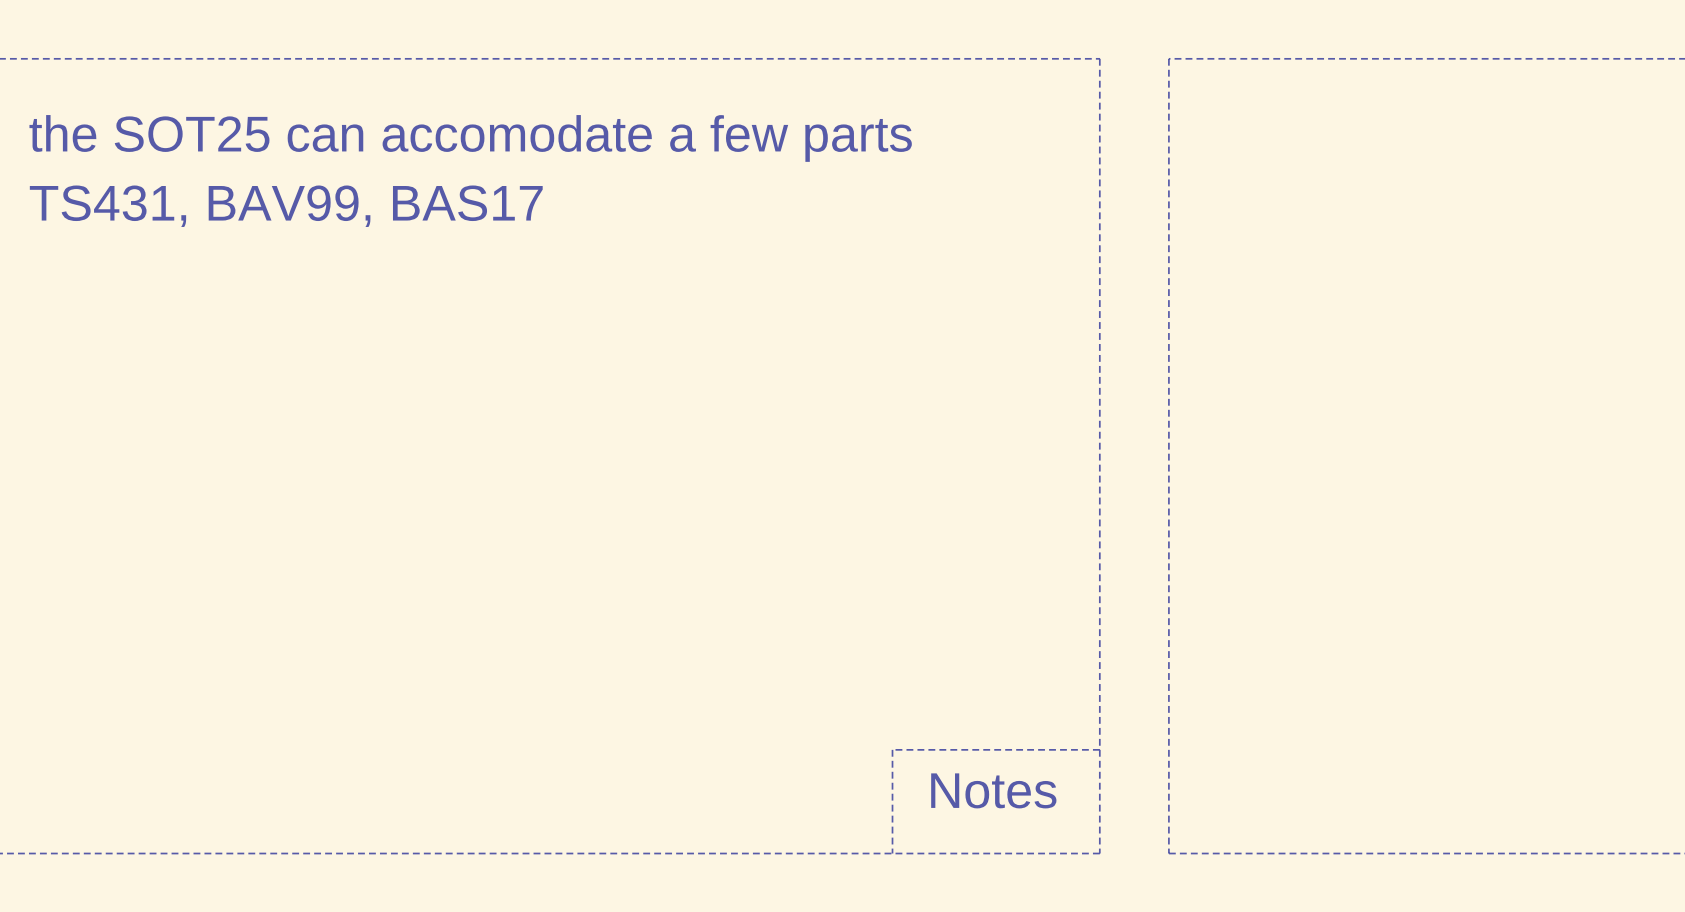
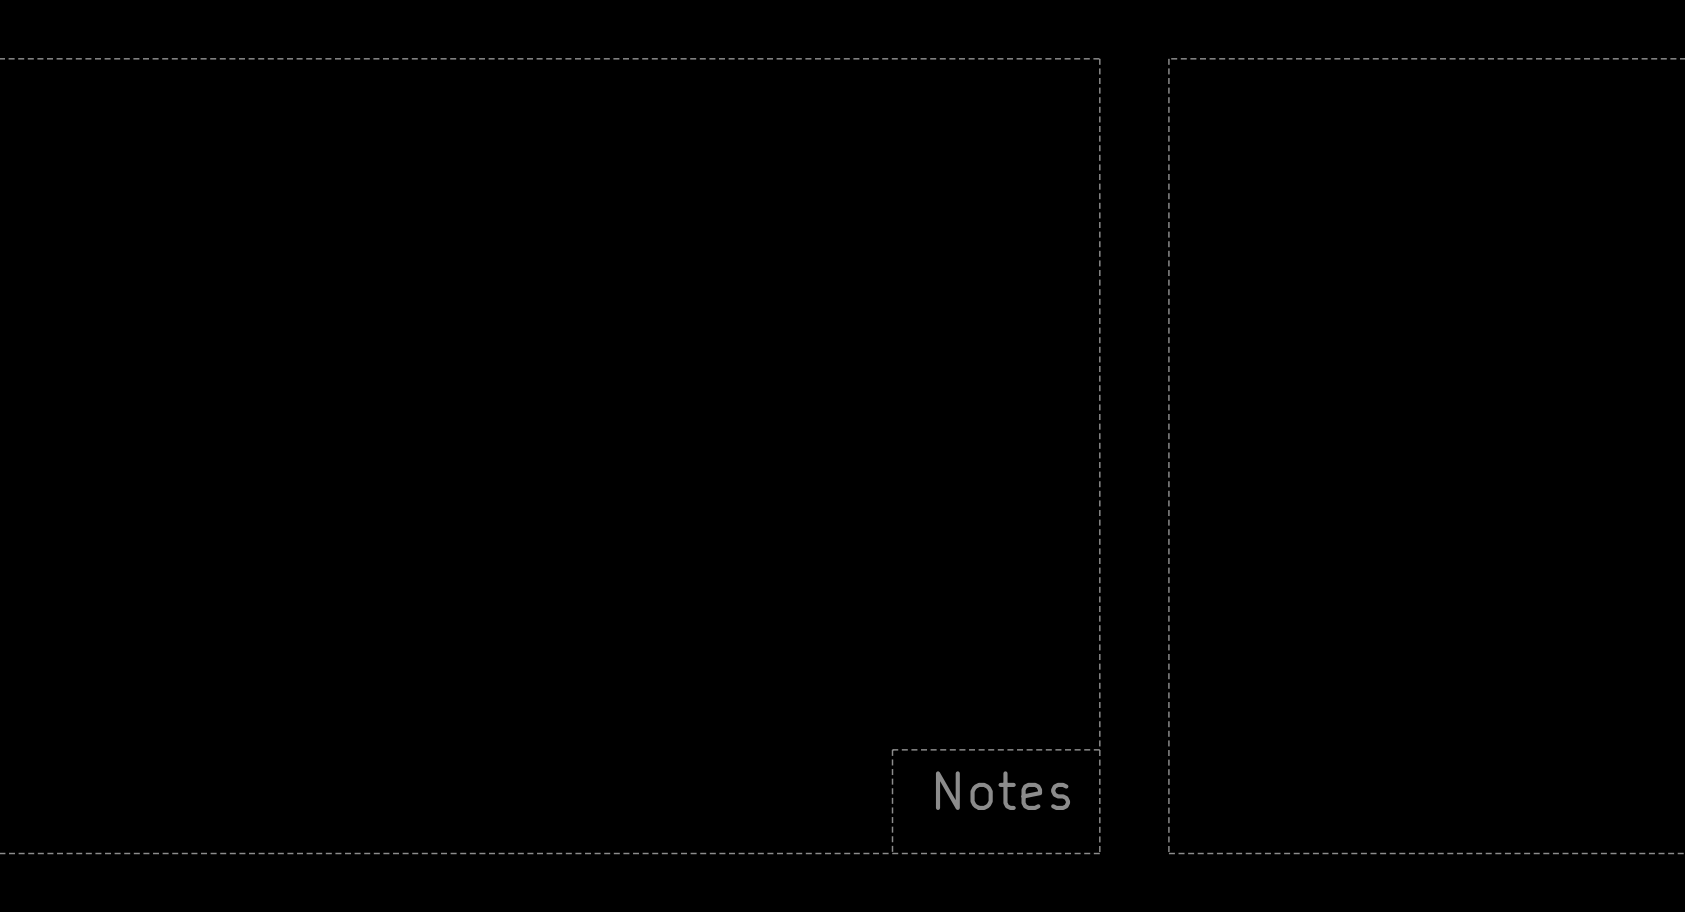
text: the SOT25 can accomodate a few parts (470, 138) -> none
text: TS431, BAV99, BAS17 (286, 206) -> none

